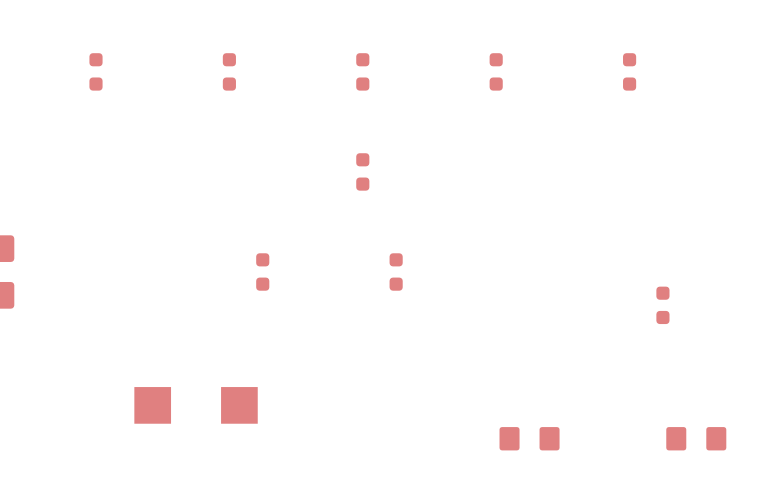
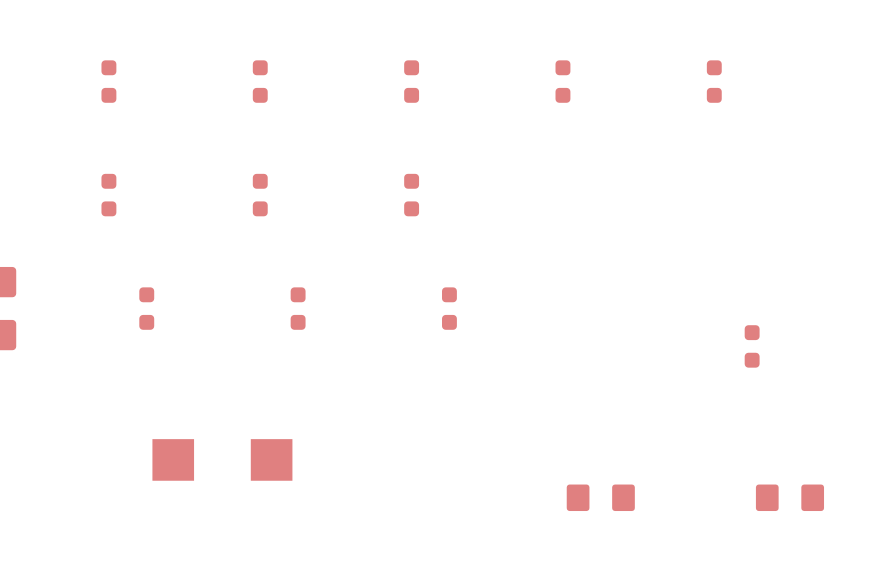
part: none -> (108, 195)
part: none -> (260, 195)
part: none -> (146, 308)

